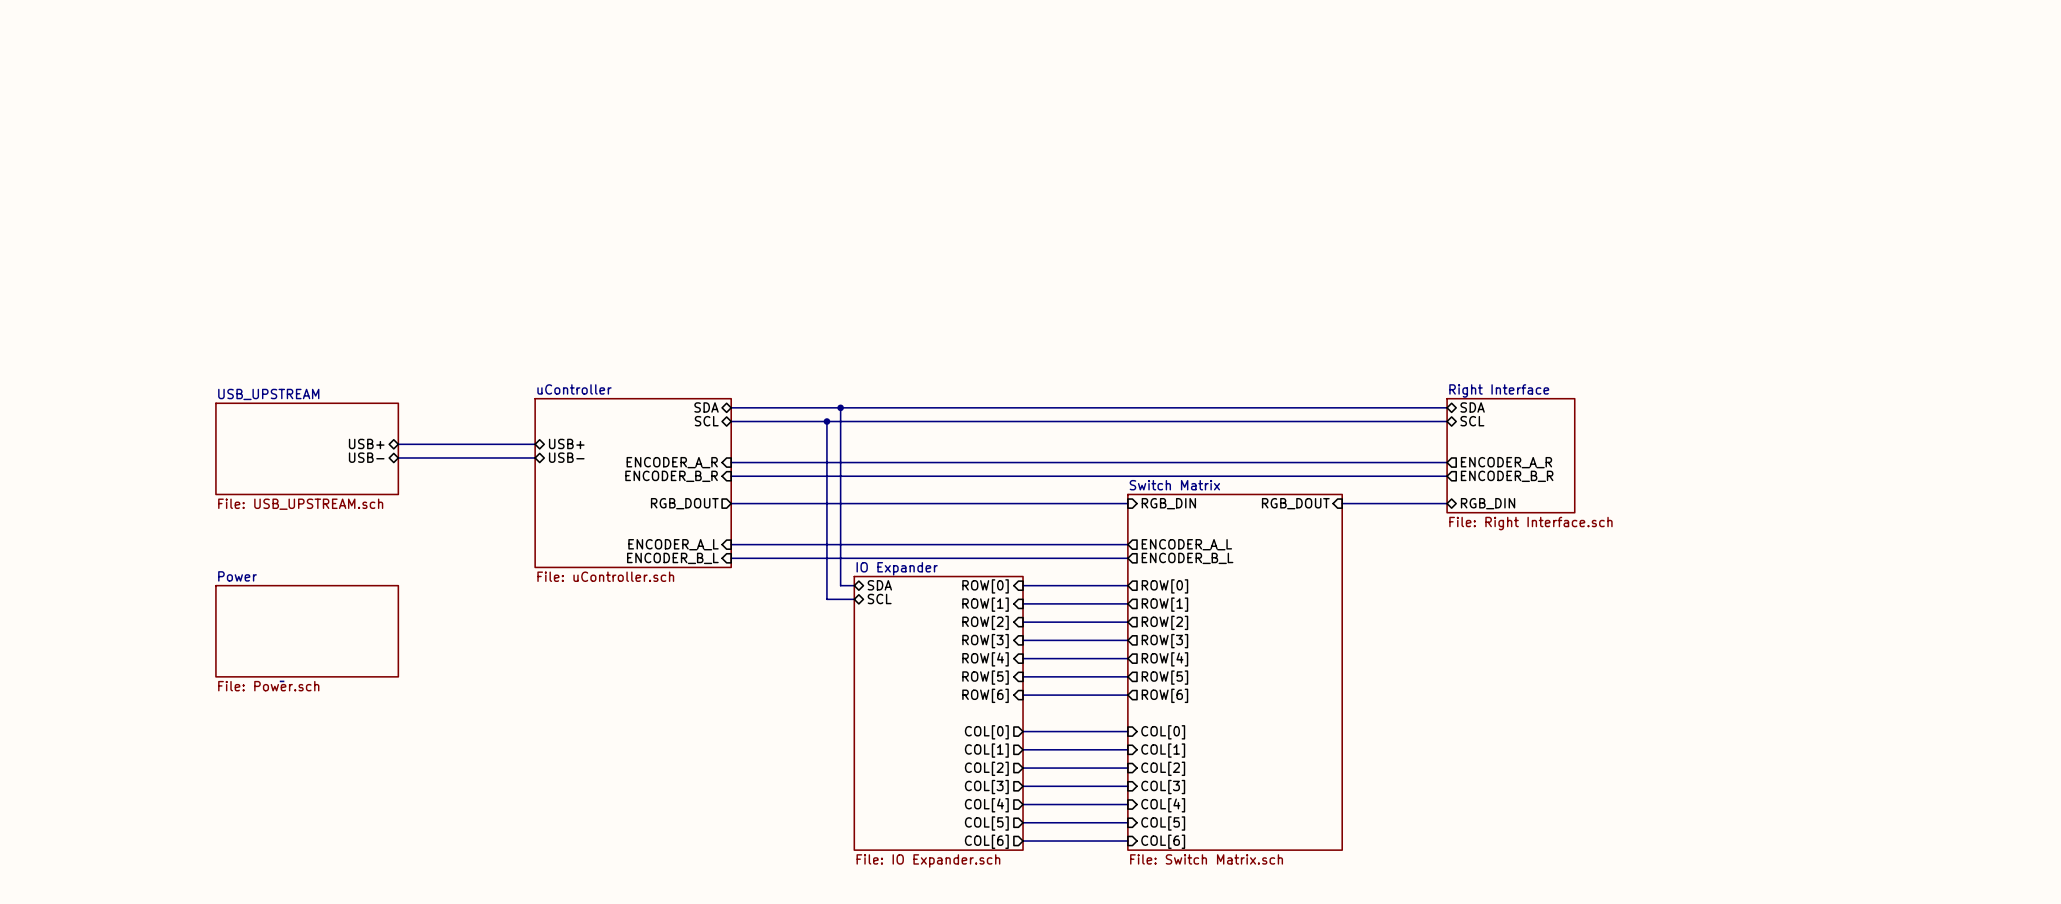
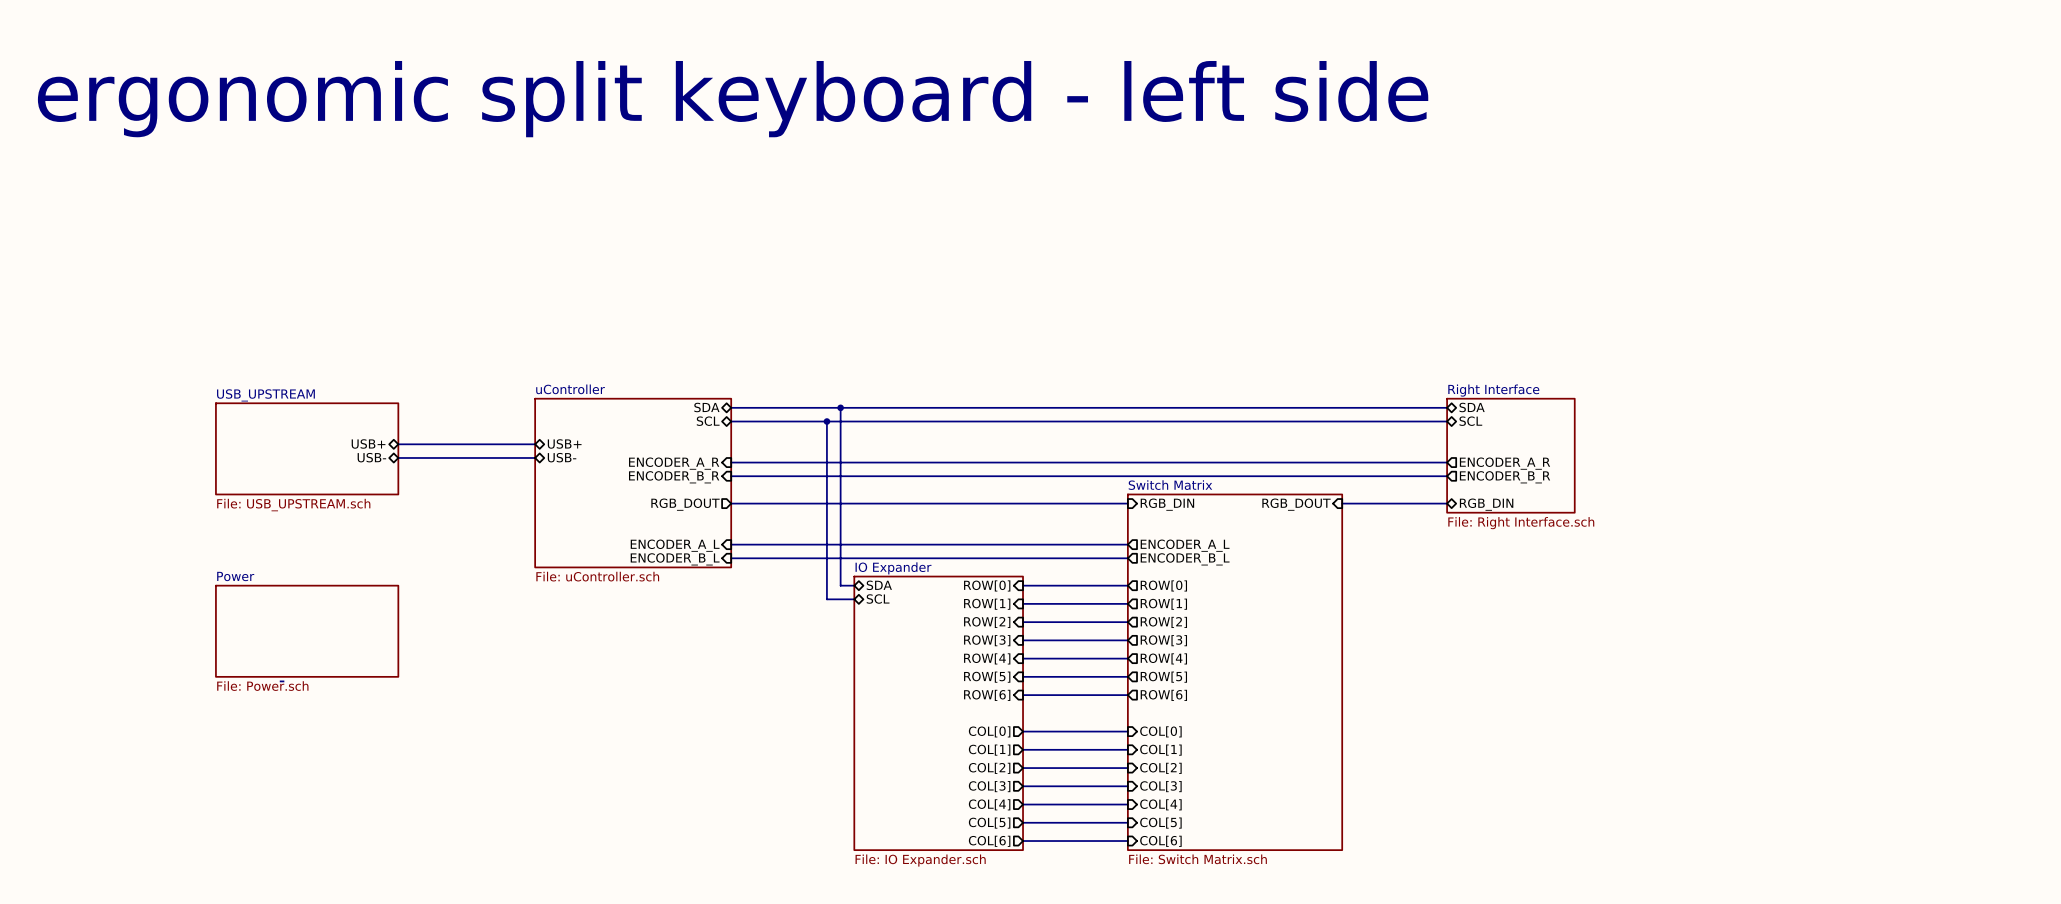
text: none -> ergonomic split keyboard - left side (733, 99)

